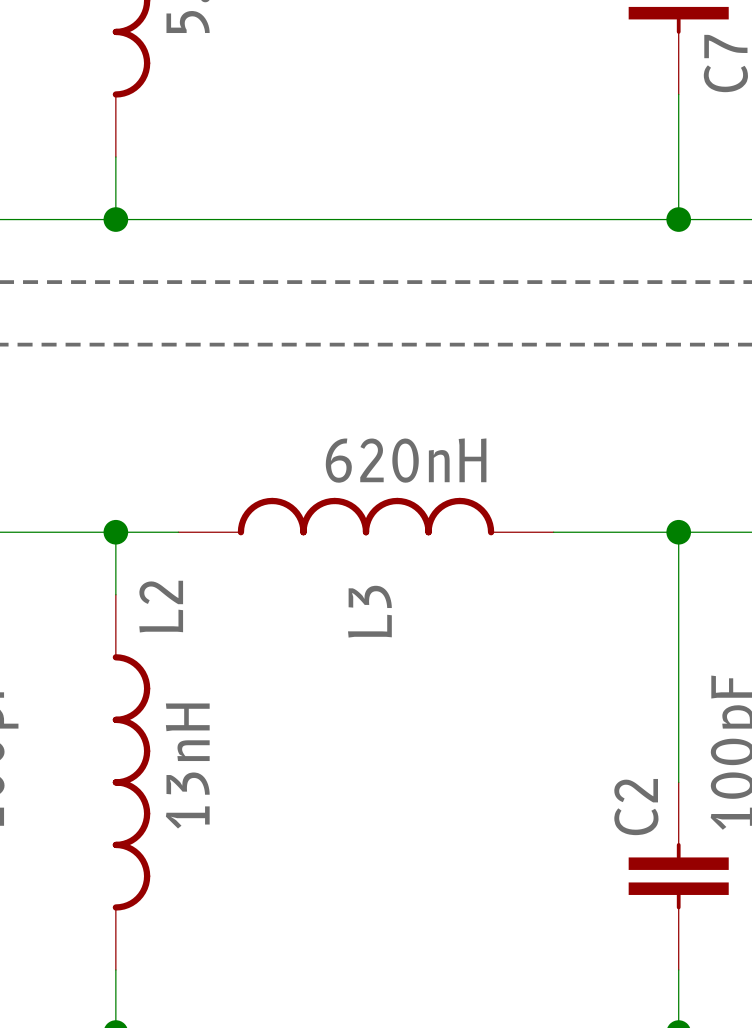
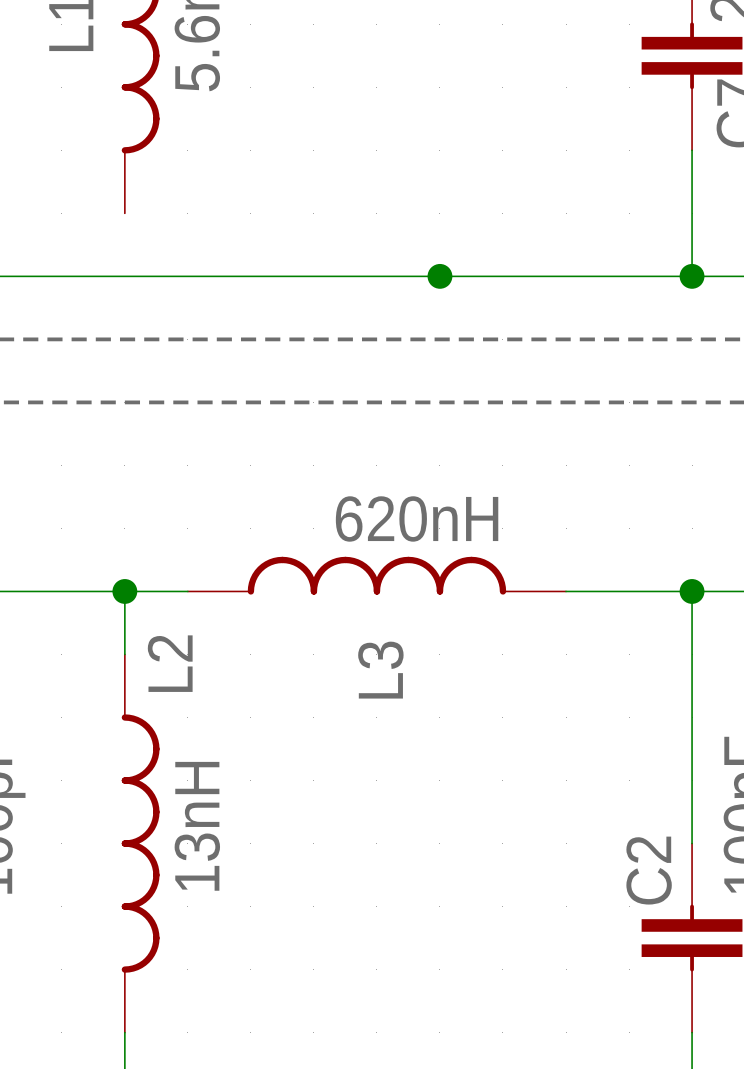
wire: (115, 157) (115, 219) -> none
junction: (115, 219) -> none
junction: none -> (439, 276)

